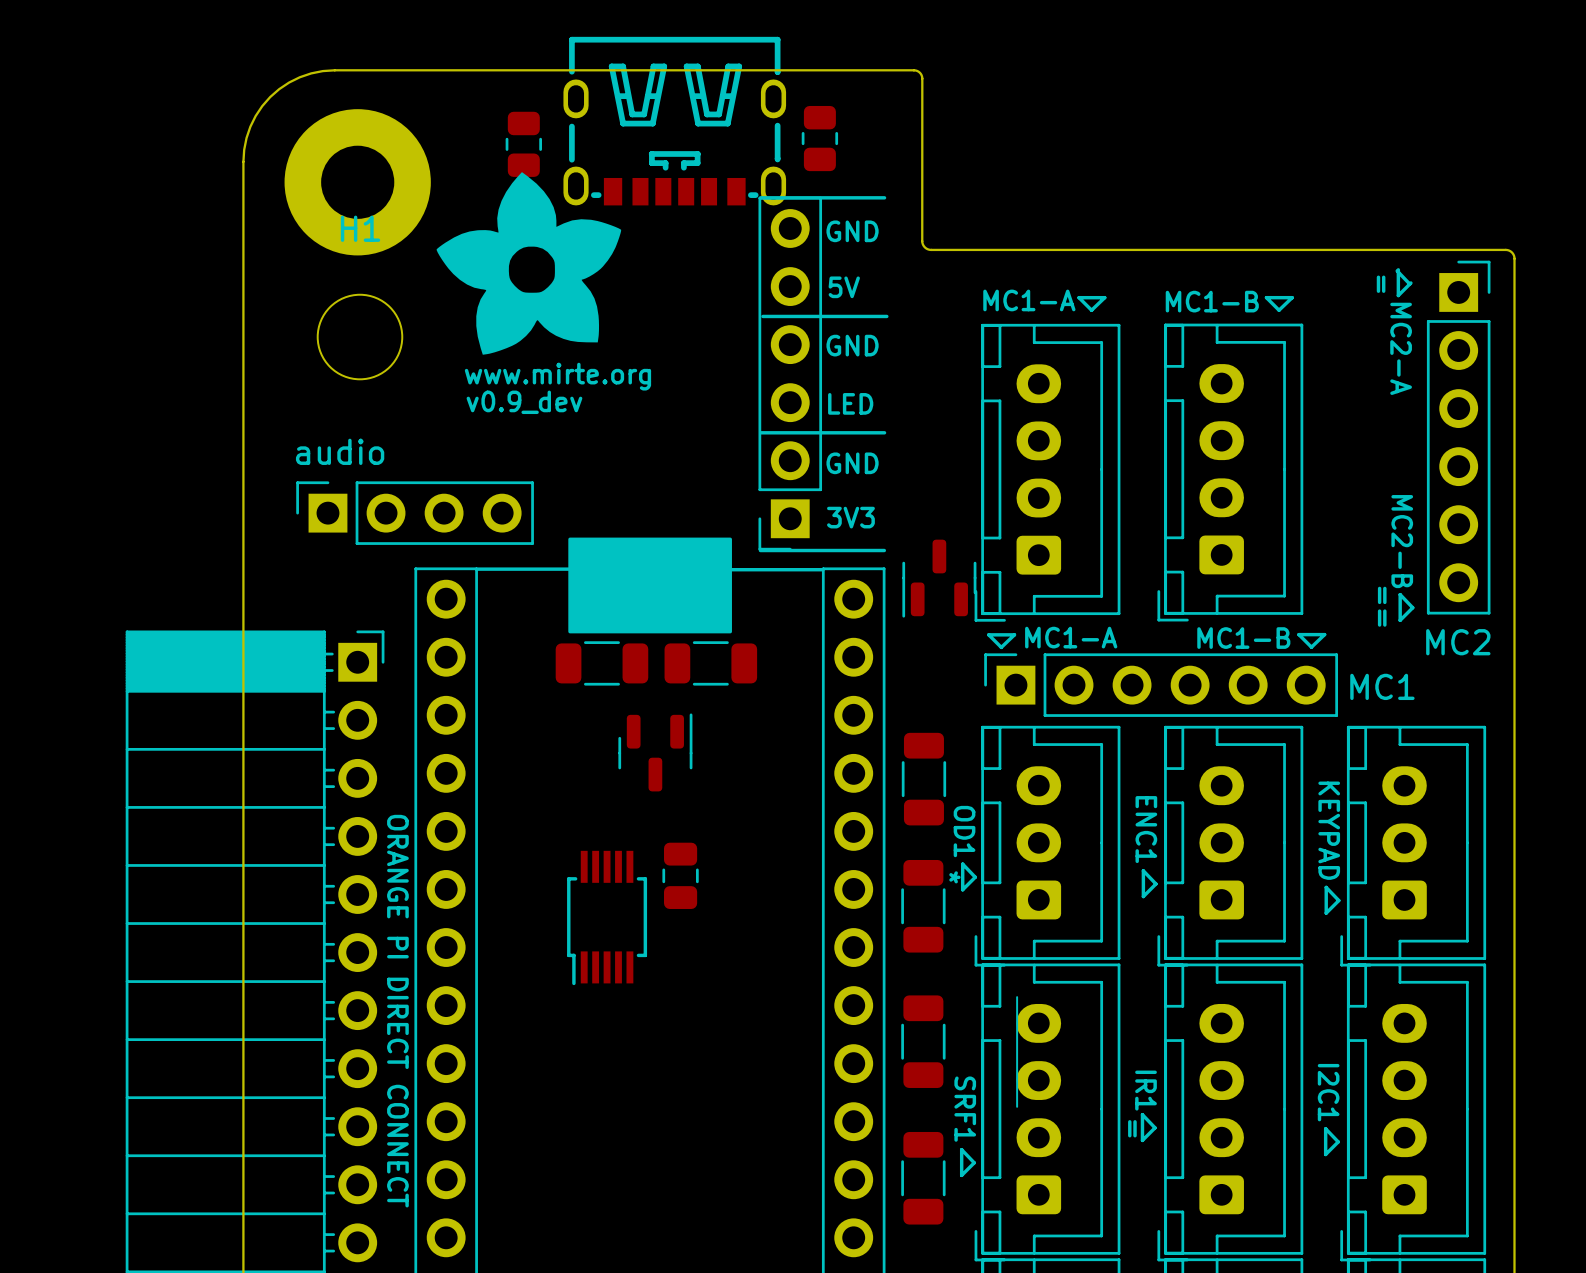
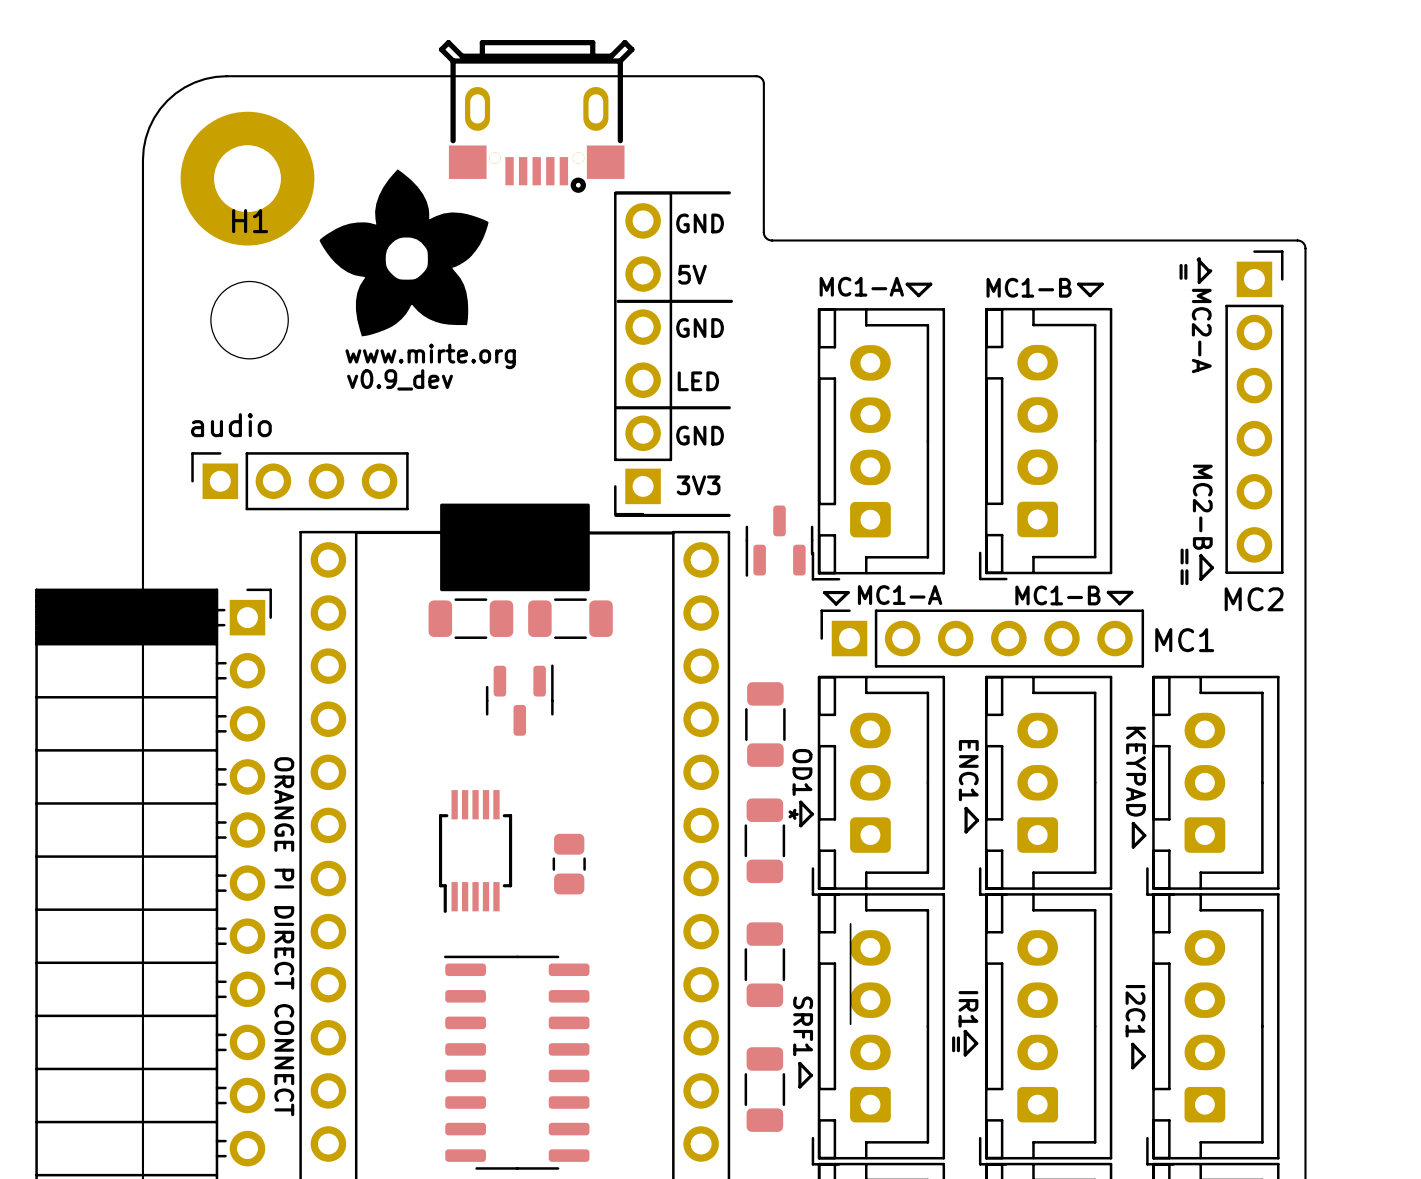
part footprint: [563, 36, 787, 206] -> [438, 40, 635, 193]
part: (819, 138) -> none
part: (523, 144) -> none
part position: (680, 875) -> (569, 864)
part: none -> (516, 1062)

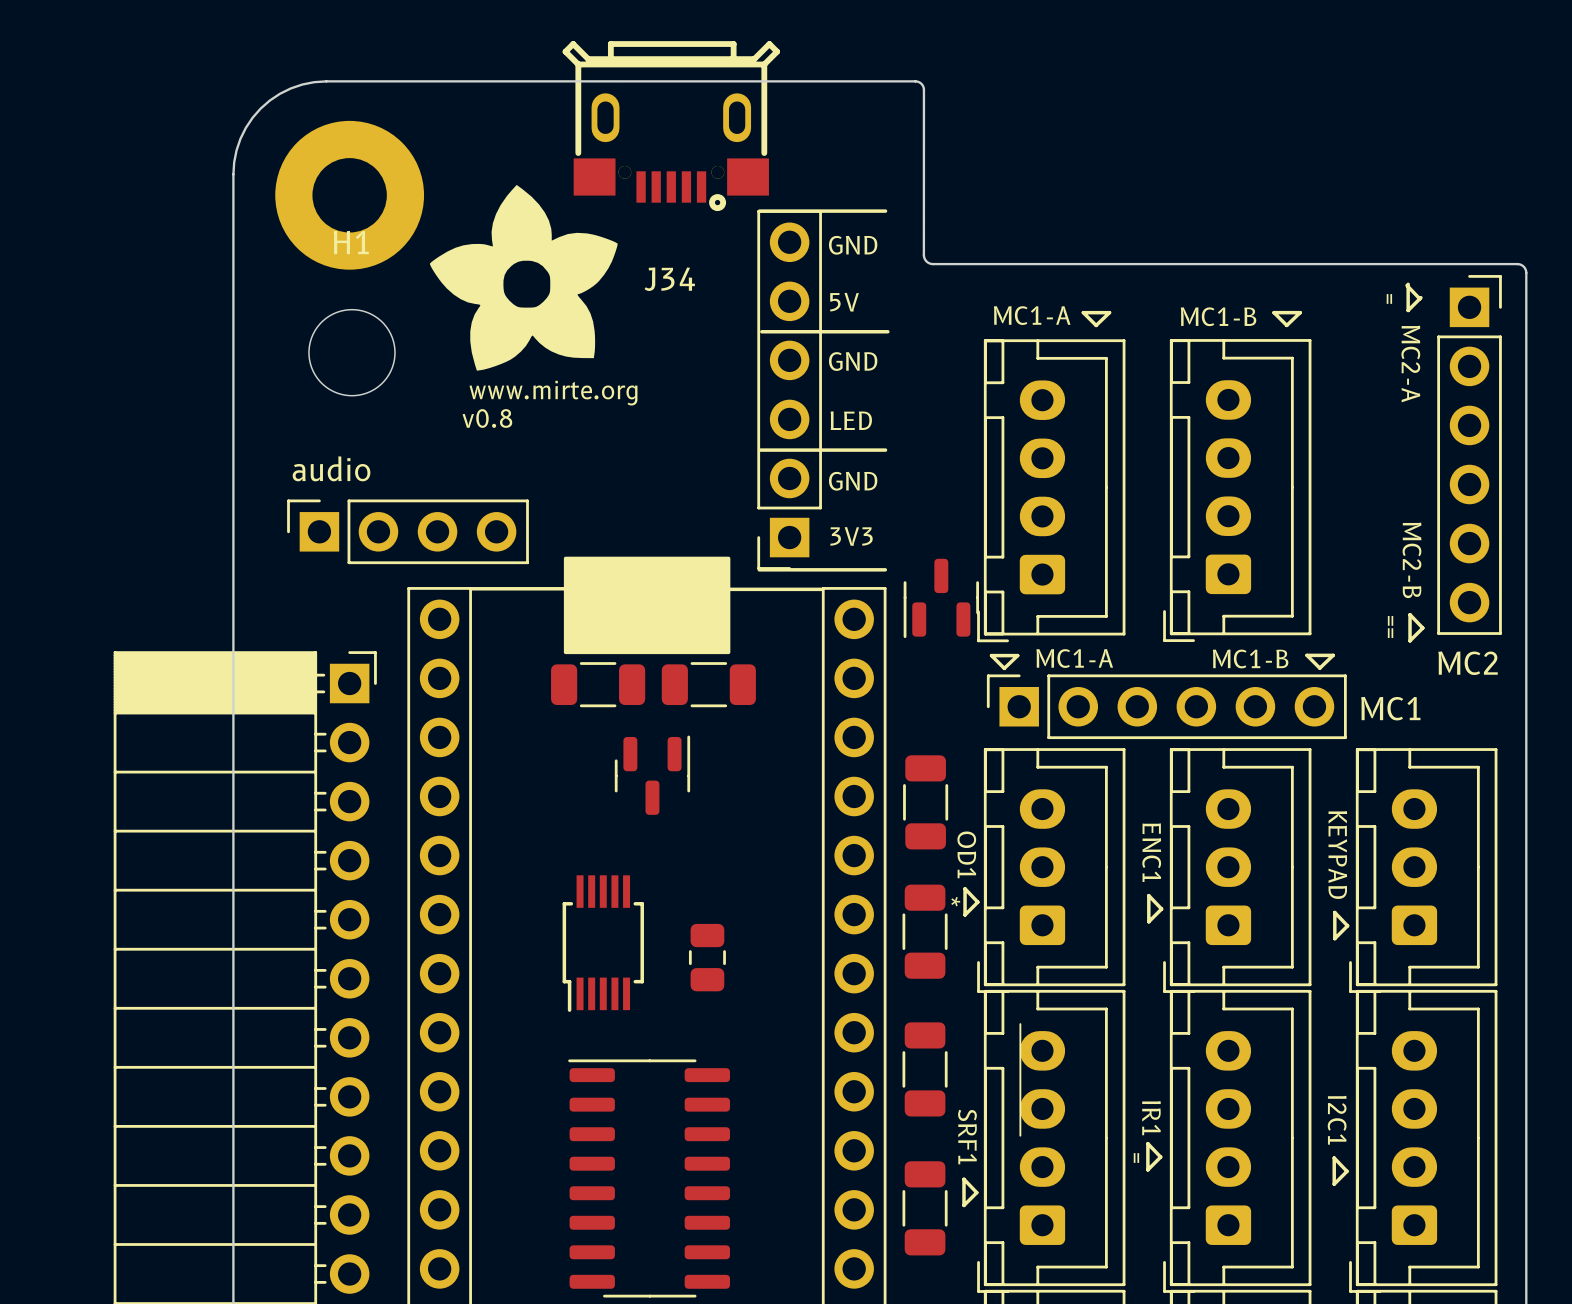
J34 name: none -> J34 (669, 279)
text: none -> v0.8 (487, 418)
text: v0.9_dev (400, 379) -> none
text: ORANGE PI DIRECT CONNECT (284, 936) -> none

